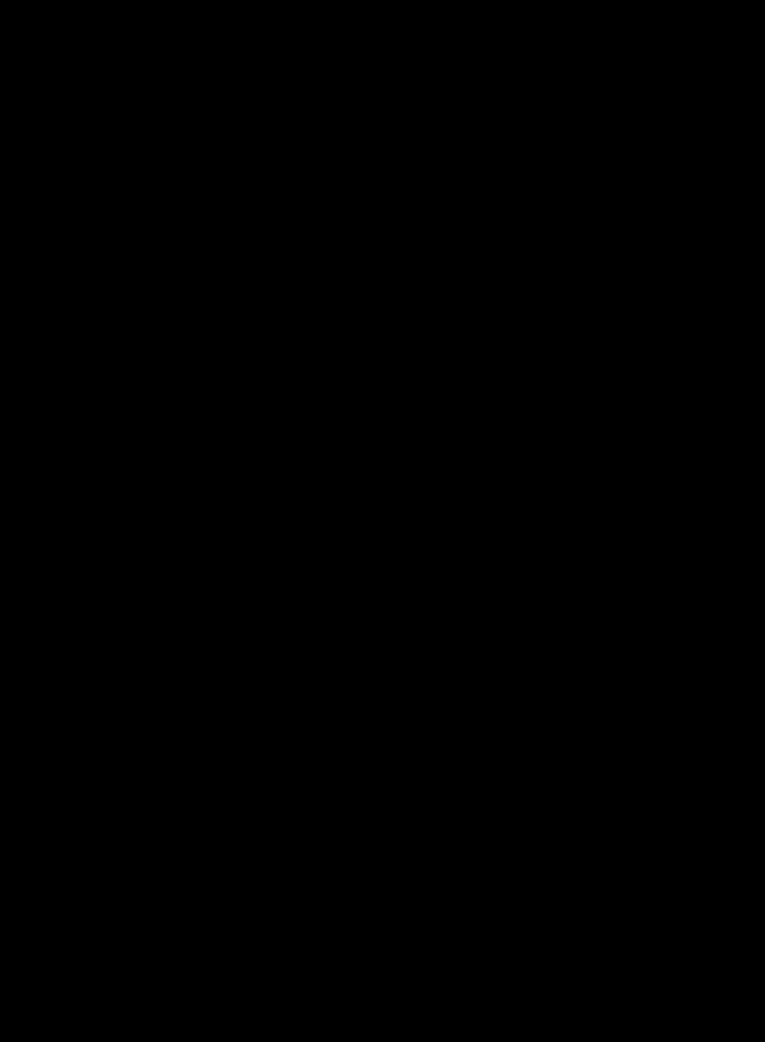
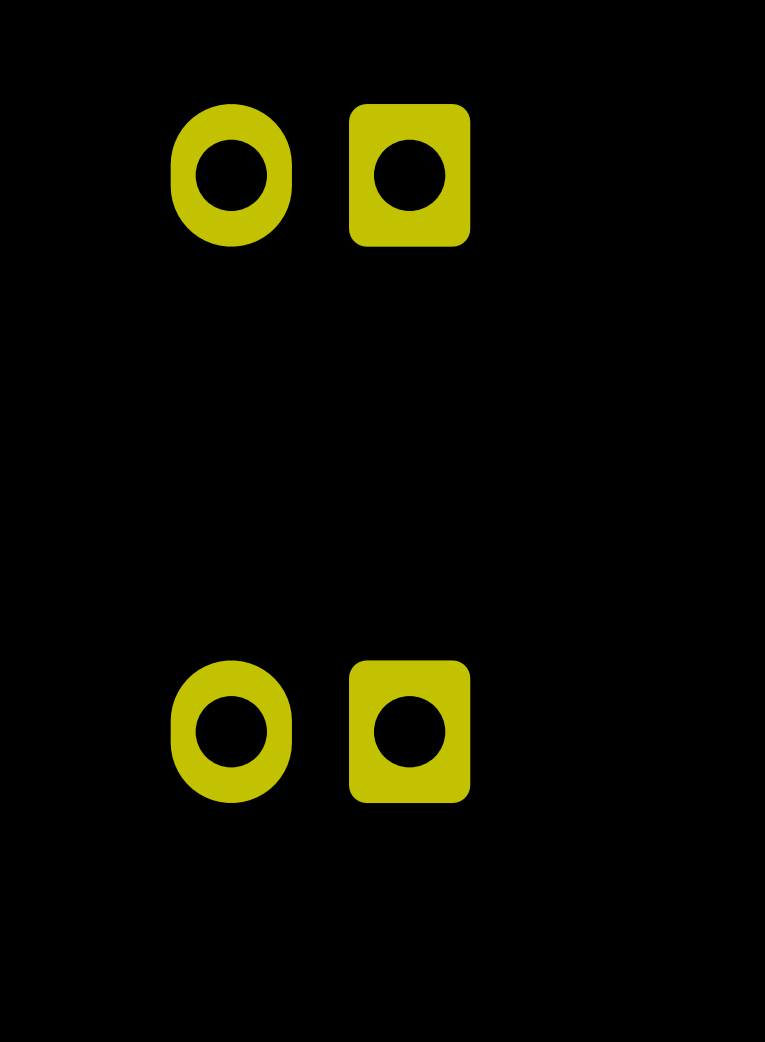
part: none -> (320, 175)
part: none -> (320, 731)

